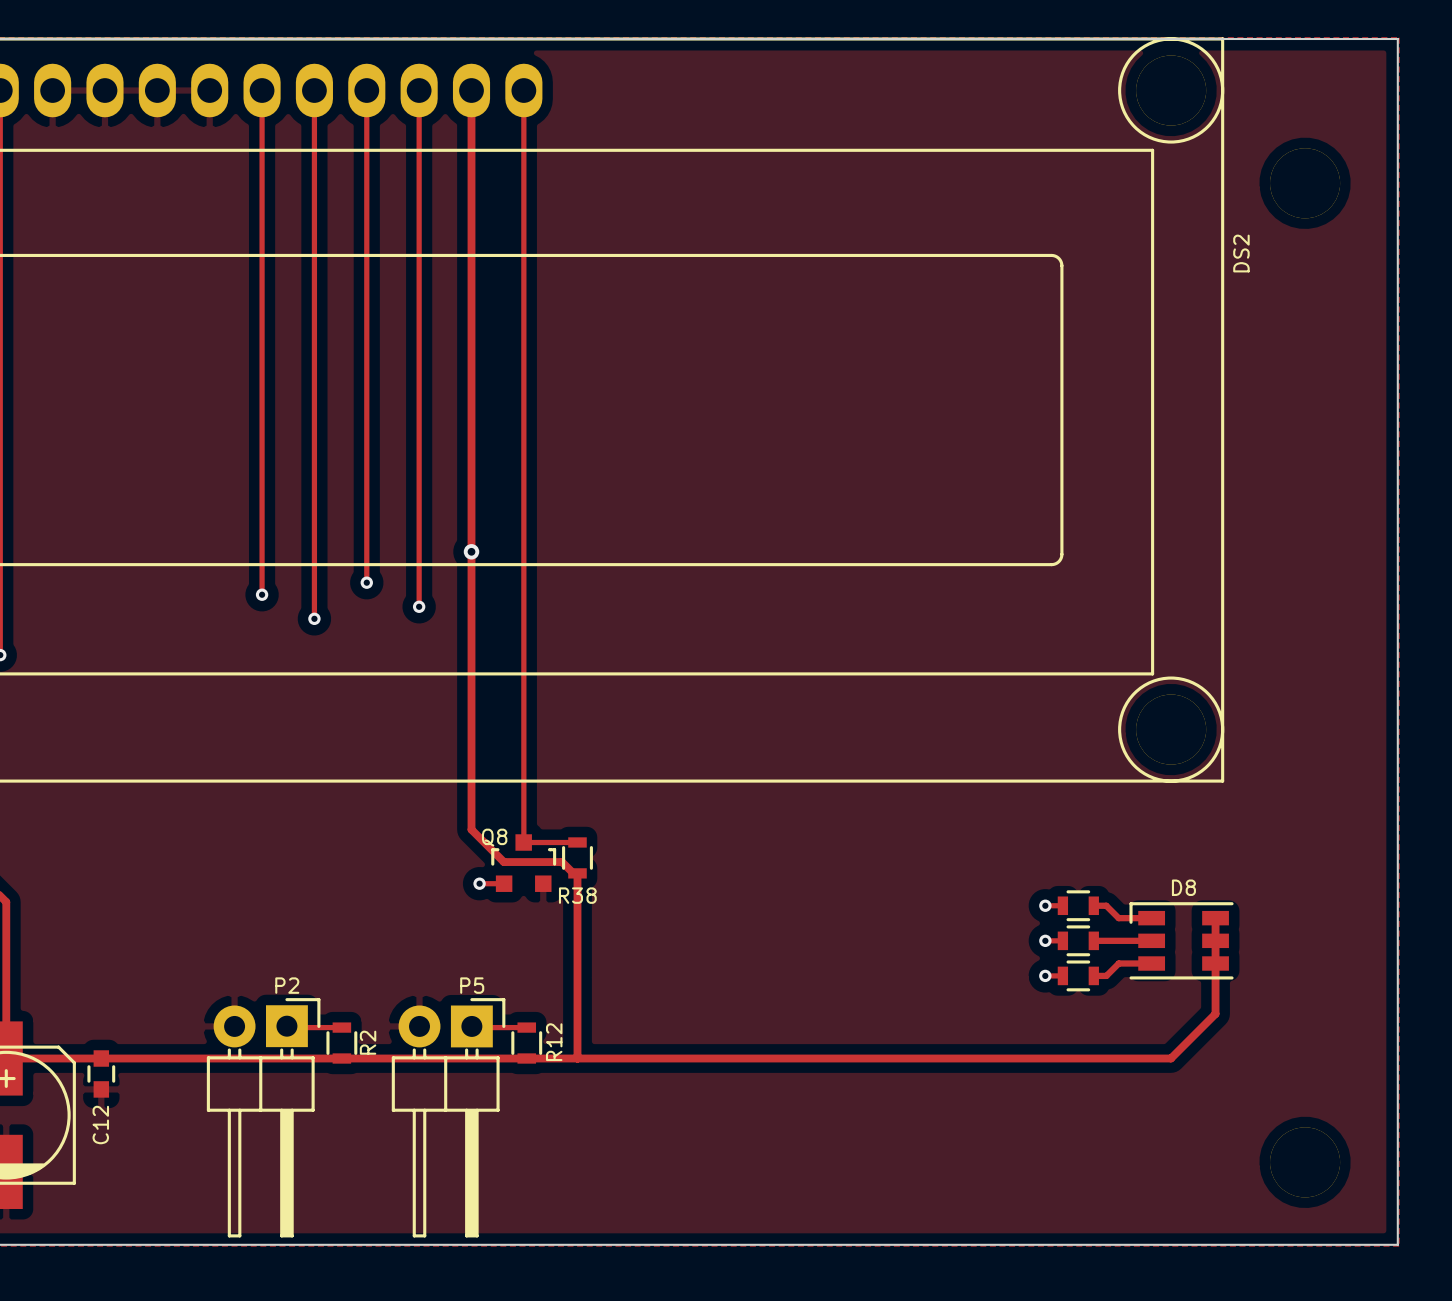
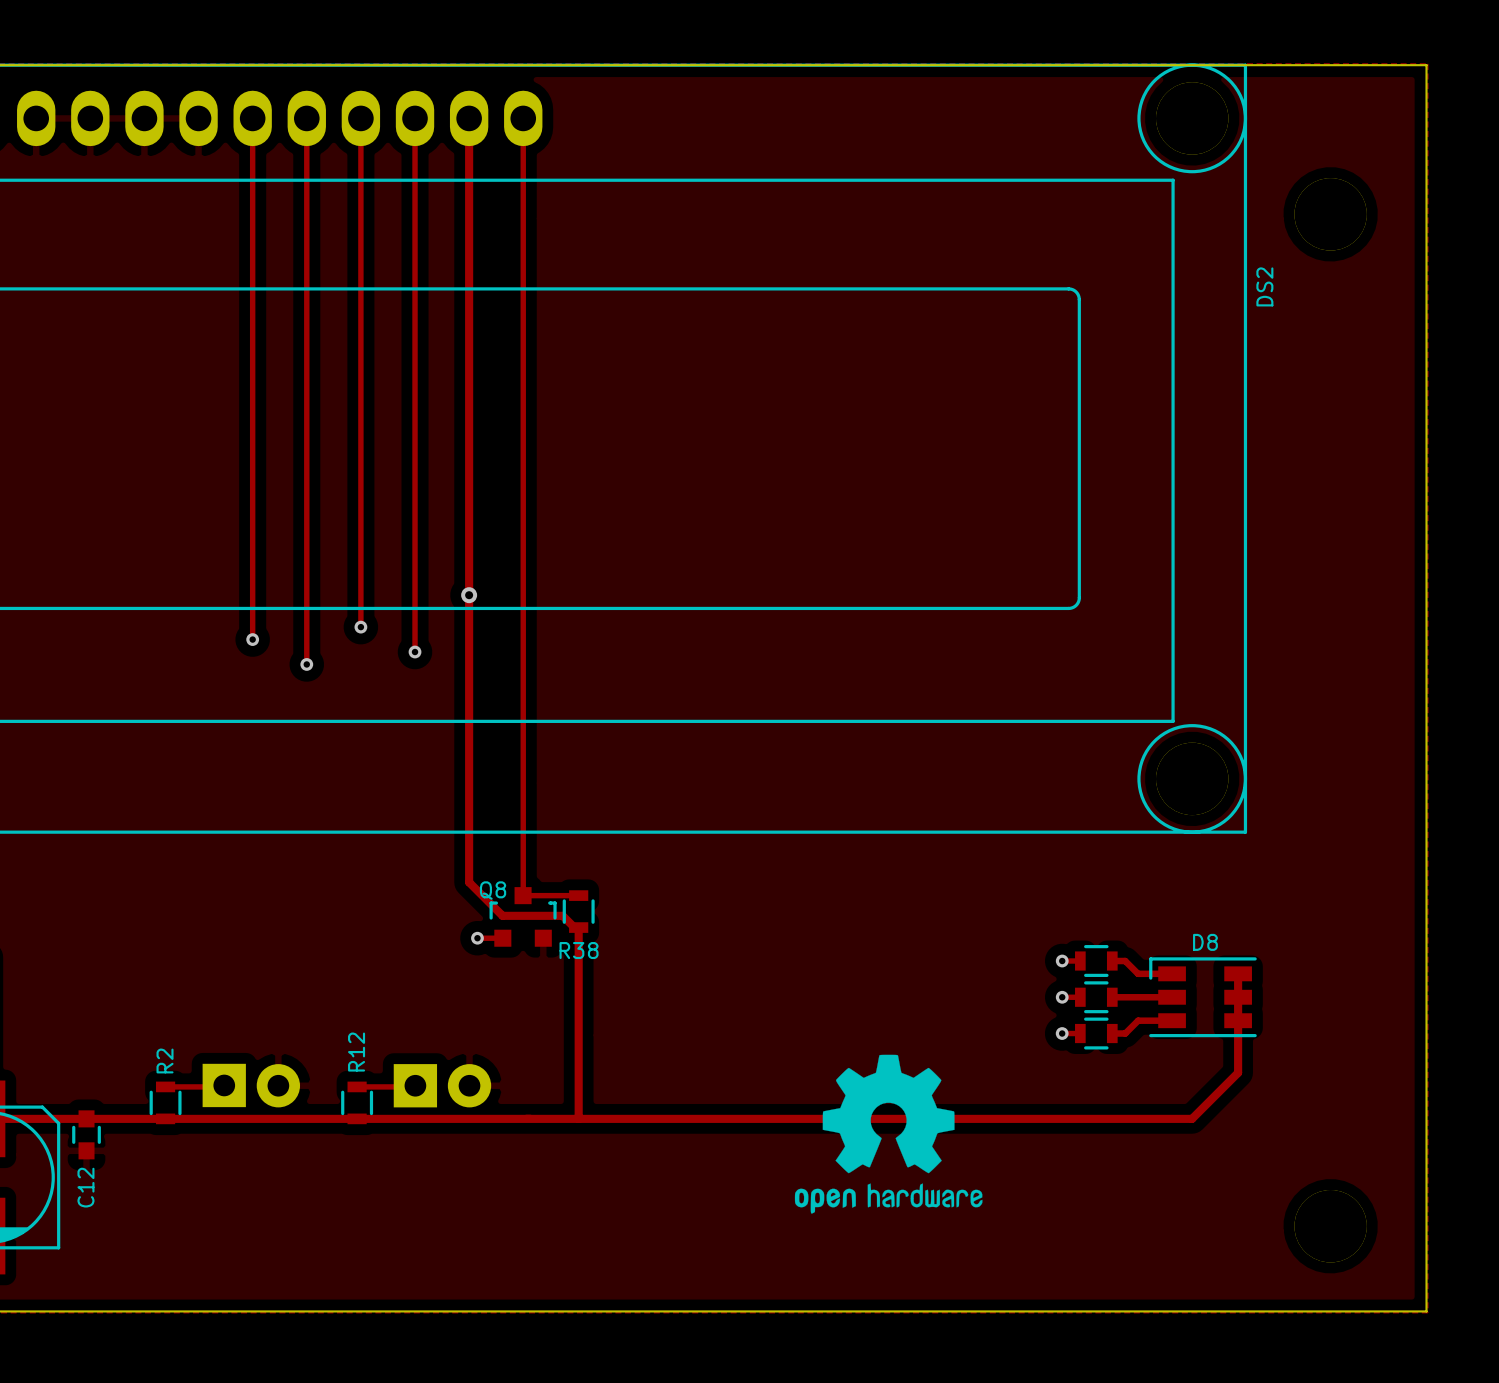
drawing: none -> [794, 1054, 983, 1214]
track: none -> (224, 1085) (165, 1086)
track: (286, 1026) (341, 1027) -> none
track: none -> (415, 1085) (357, 1086)
track: (471, 1026) (526, 1027) -> none
R2 name position: R2 (368, 1042) -> R2 (165, 1061)
R12 name position: R12 (554, 1042) -> R12 (356, 1052)
R2 position: (341, 1043) -> (165, 1102)
R12 position: (526, 1043) -> (357, 1102)
P2 side: top (263, 1117) -> bottom (251, 1085)
P5 side: top (448, 1117) -> bottom (442, 1085)

